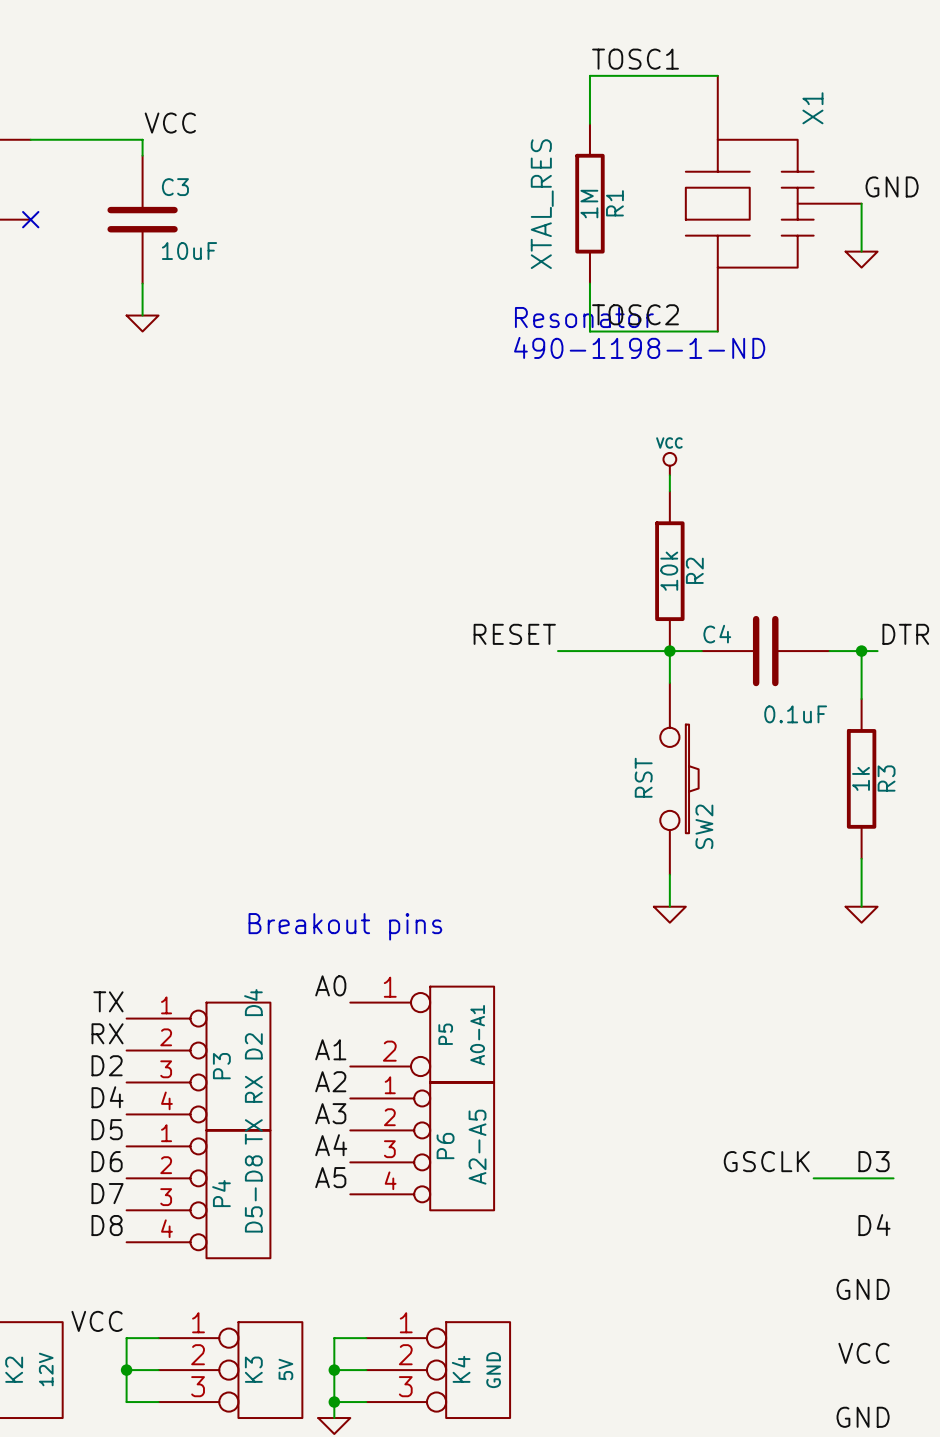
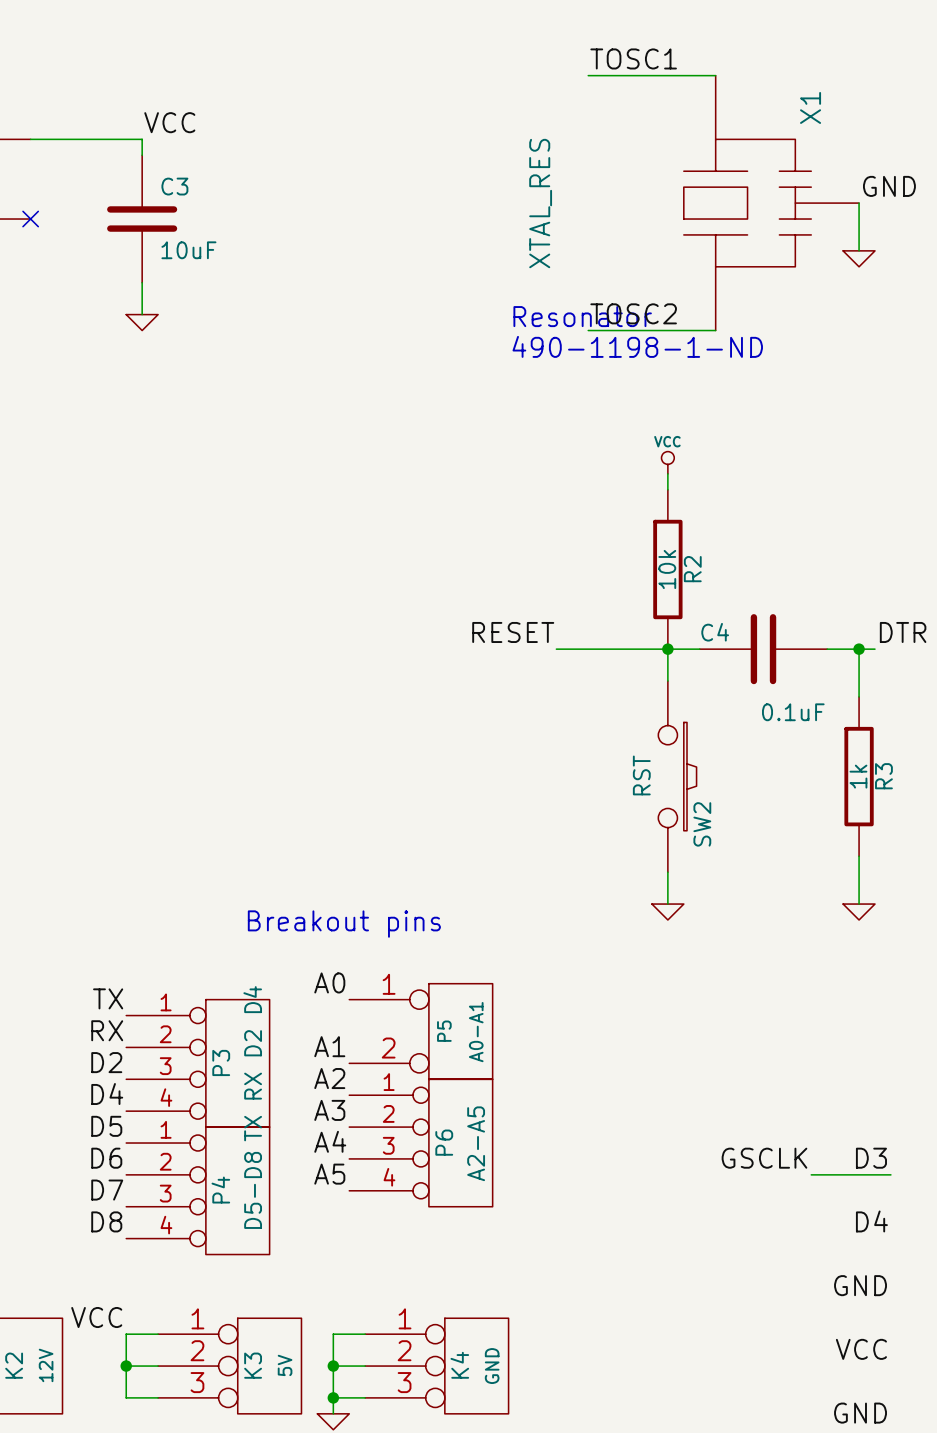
wire: (589, 75) (589, 123) -> none
R1: 1M (589, 203) -> none
wire: (589, 283) (589, 331) -> none

